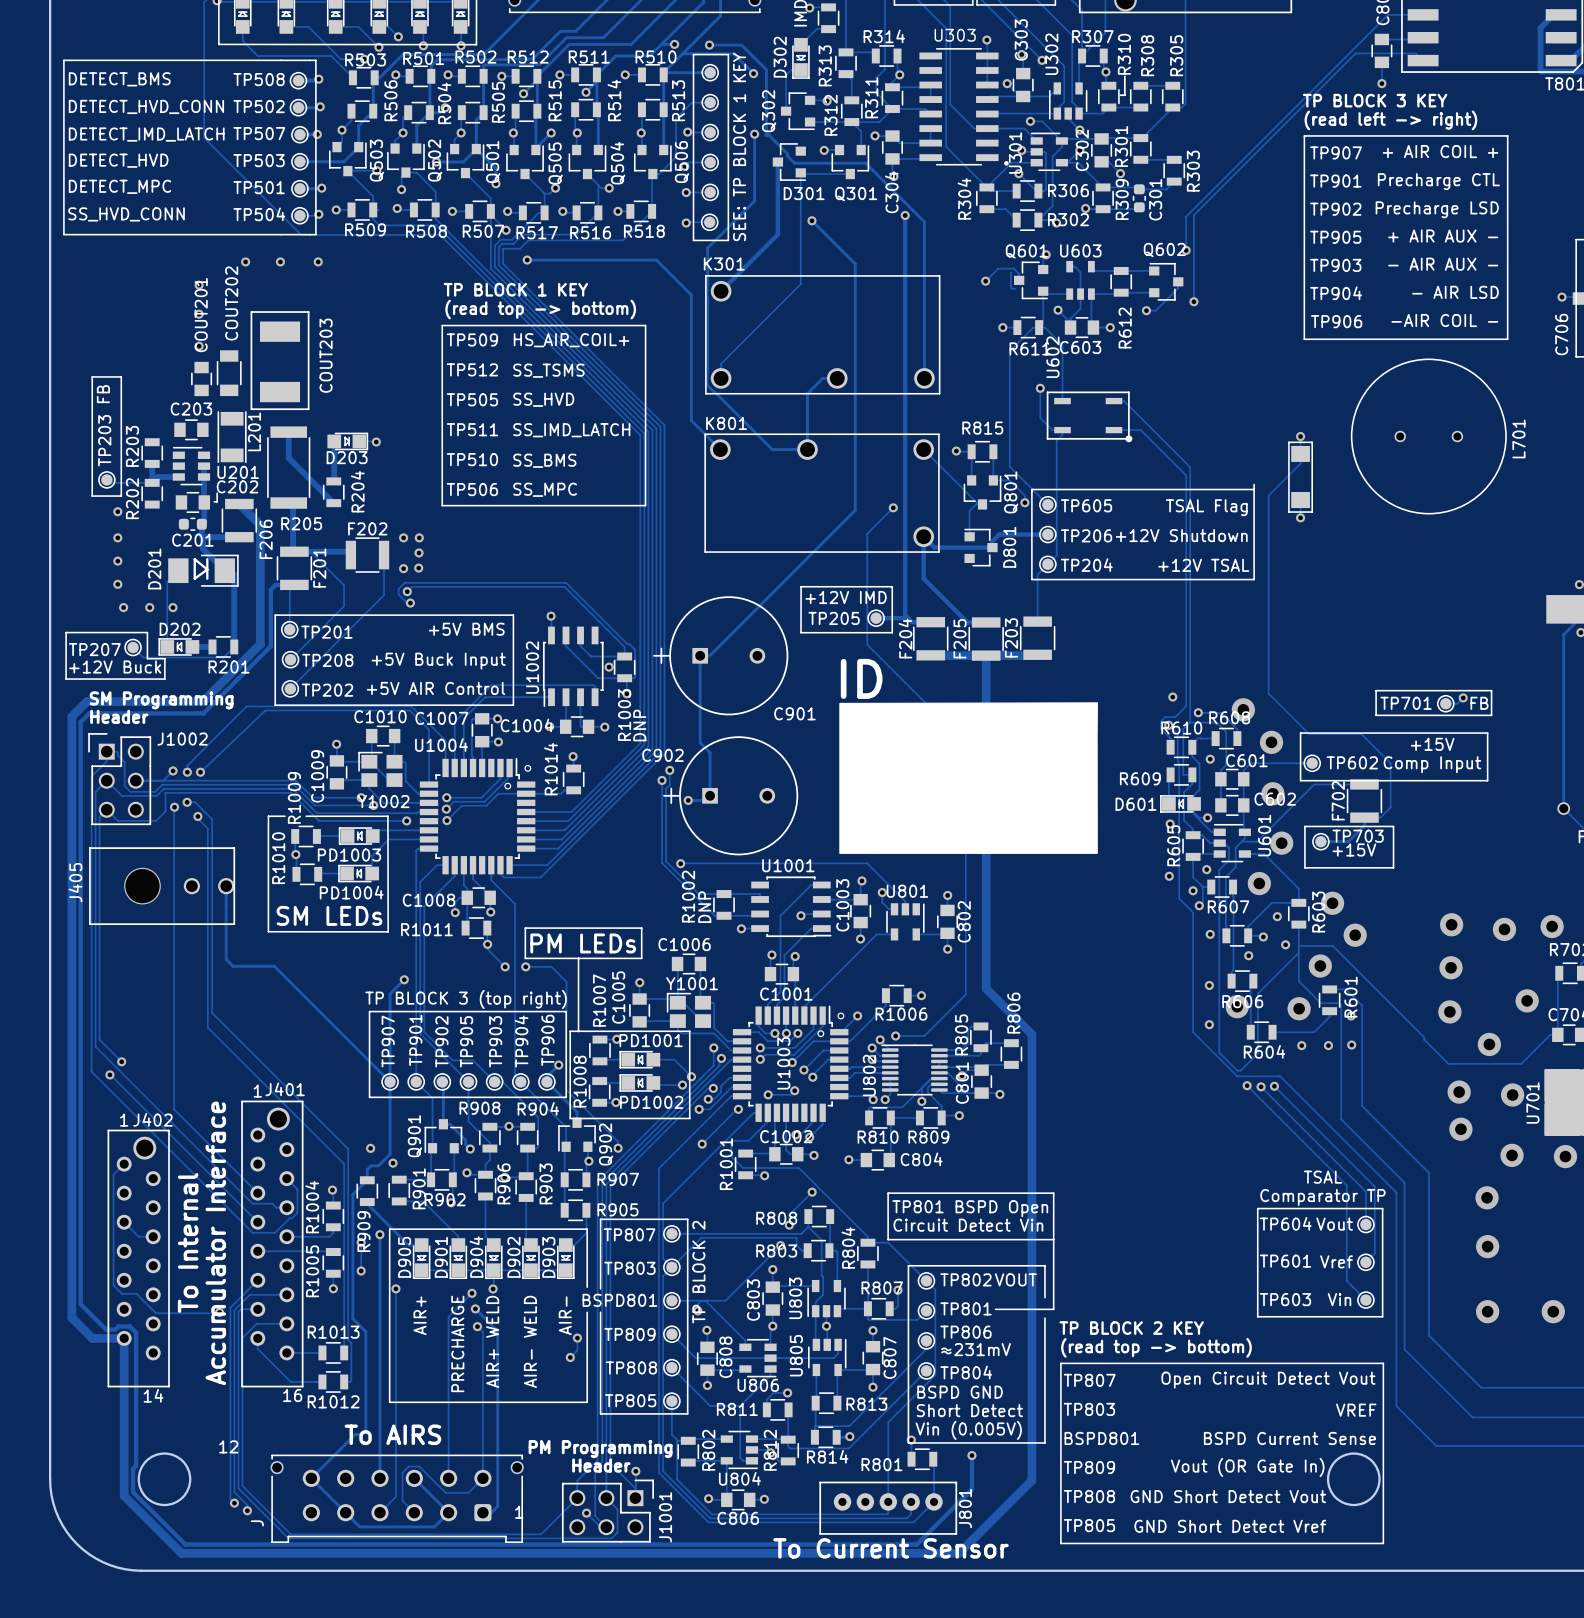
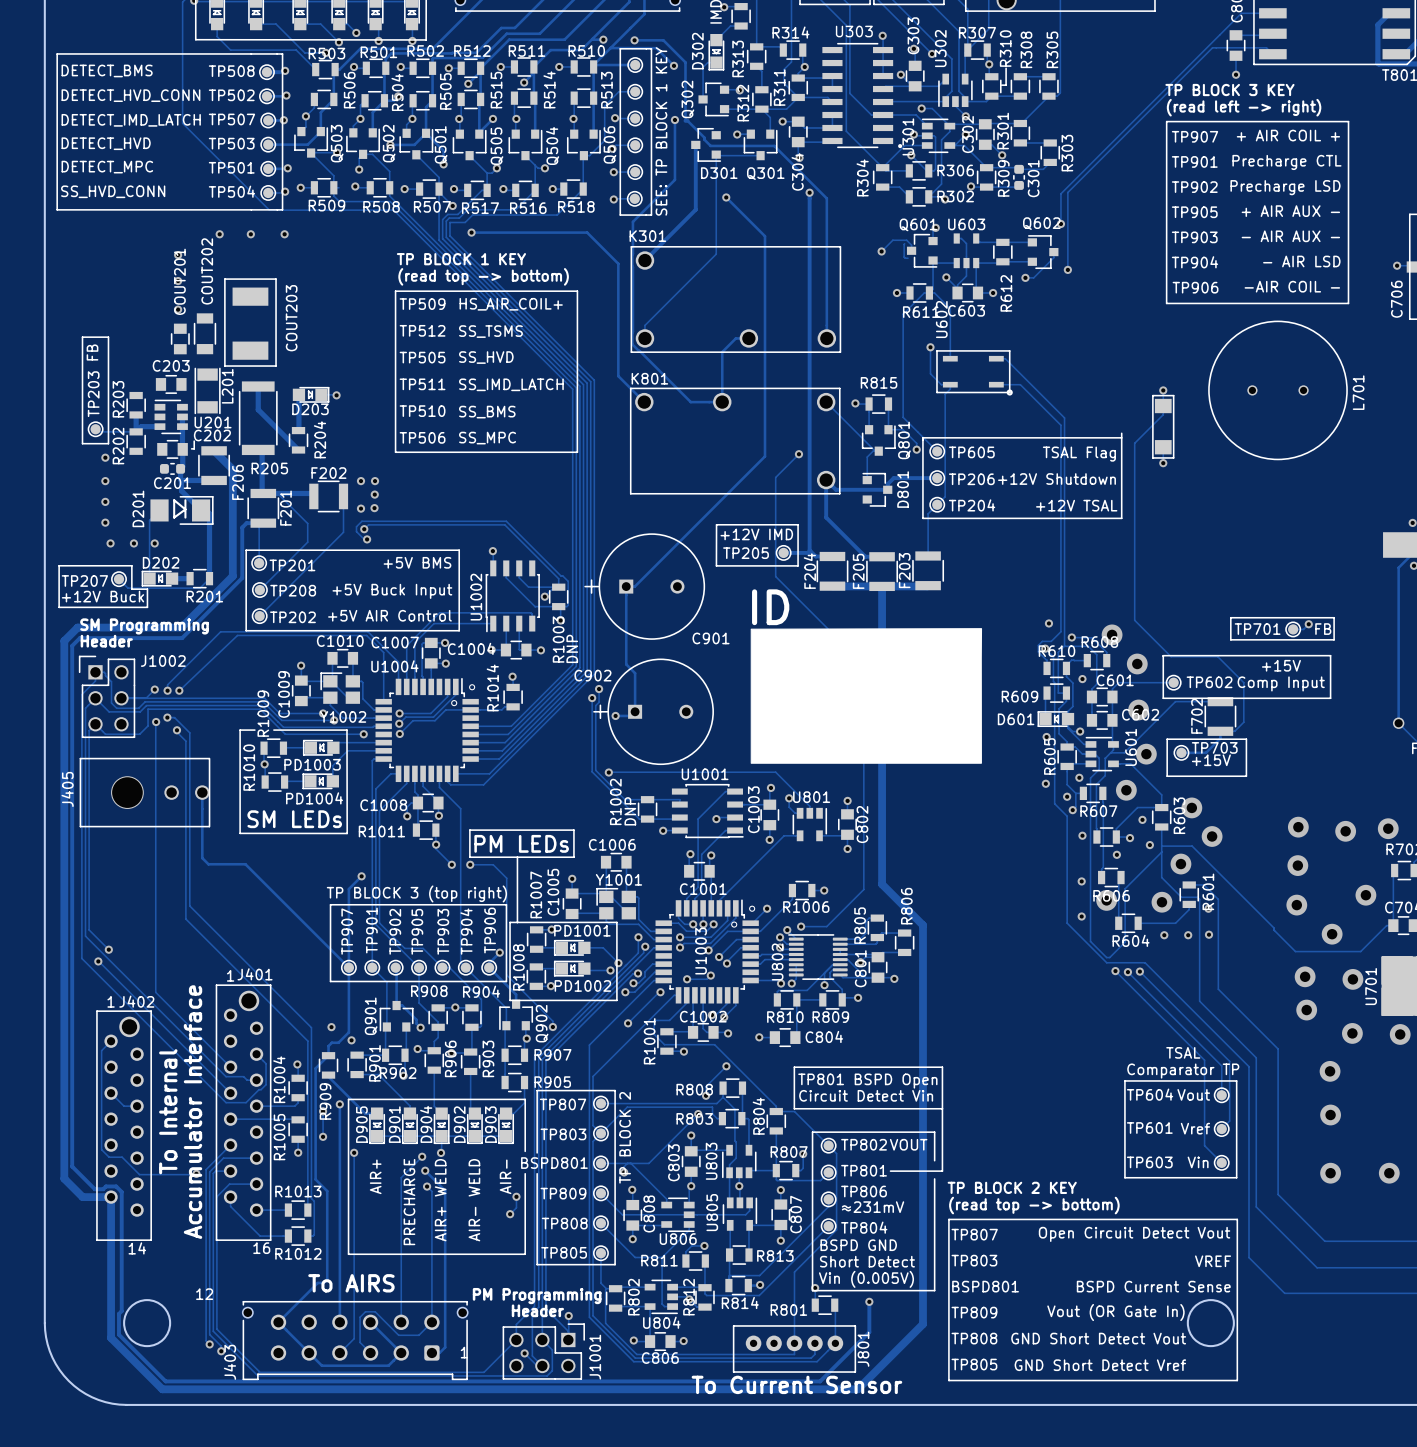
J name: J (257, 1523) -> J403 (229, 1362)

